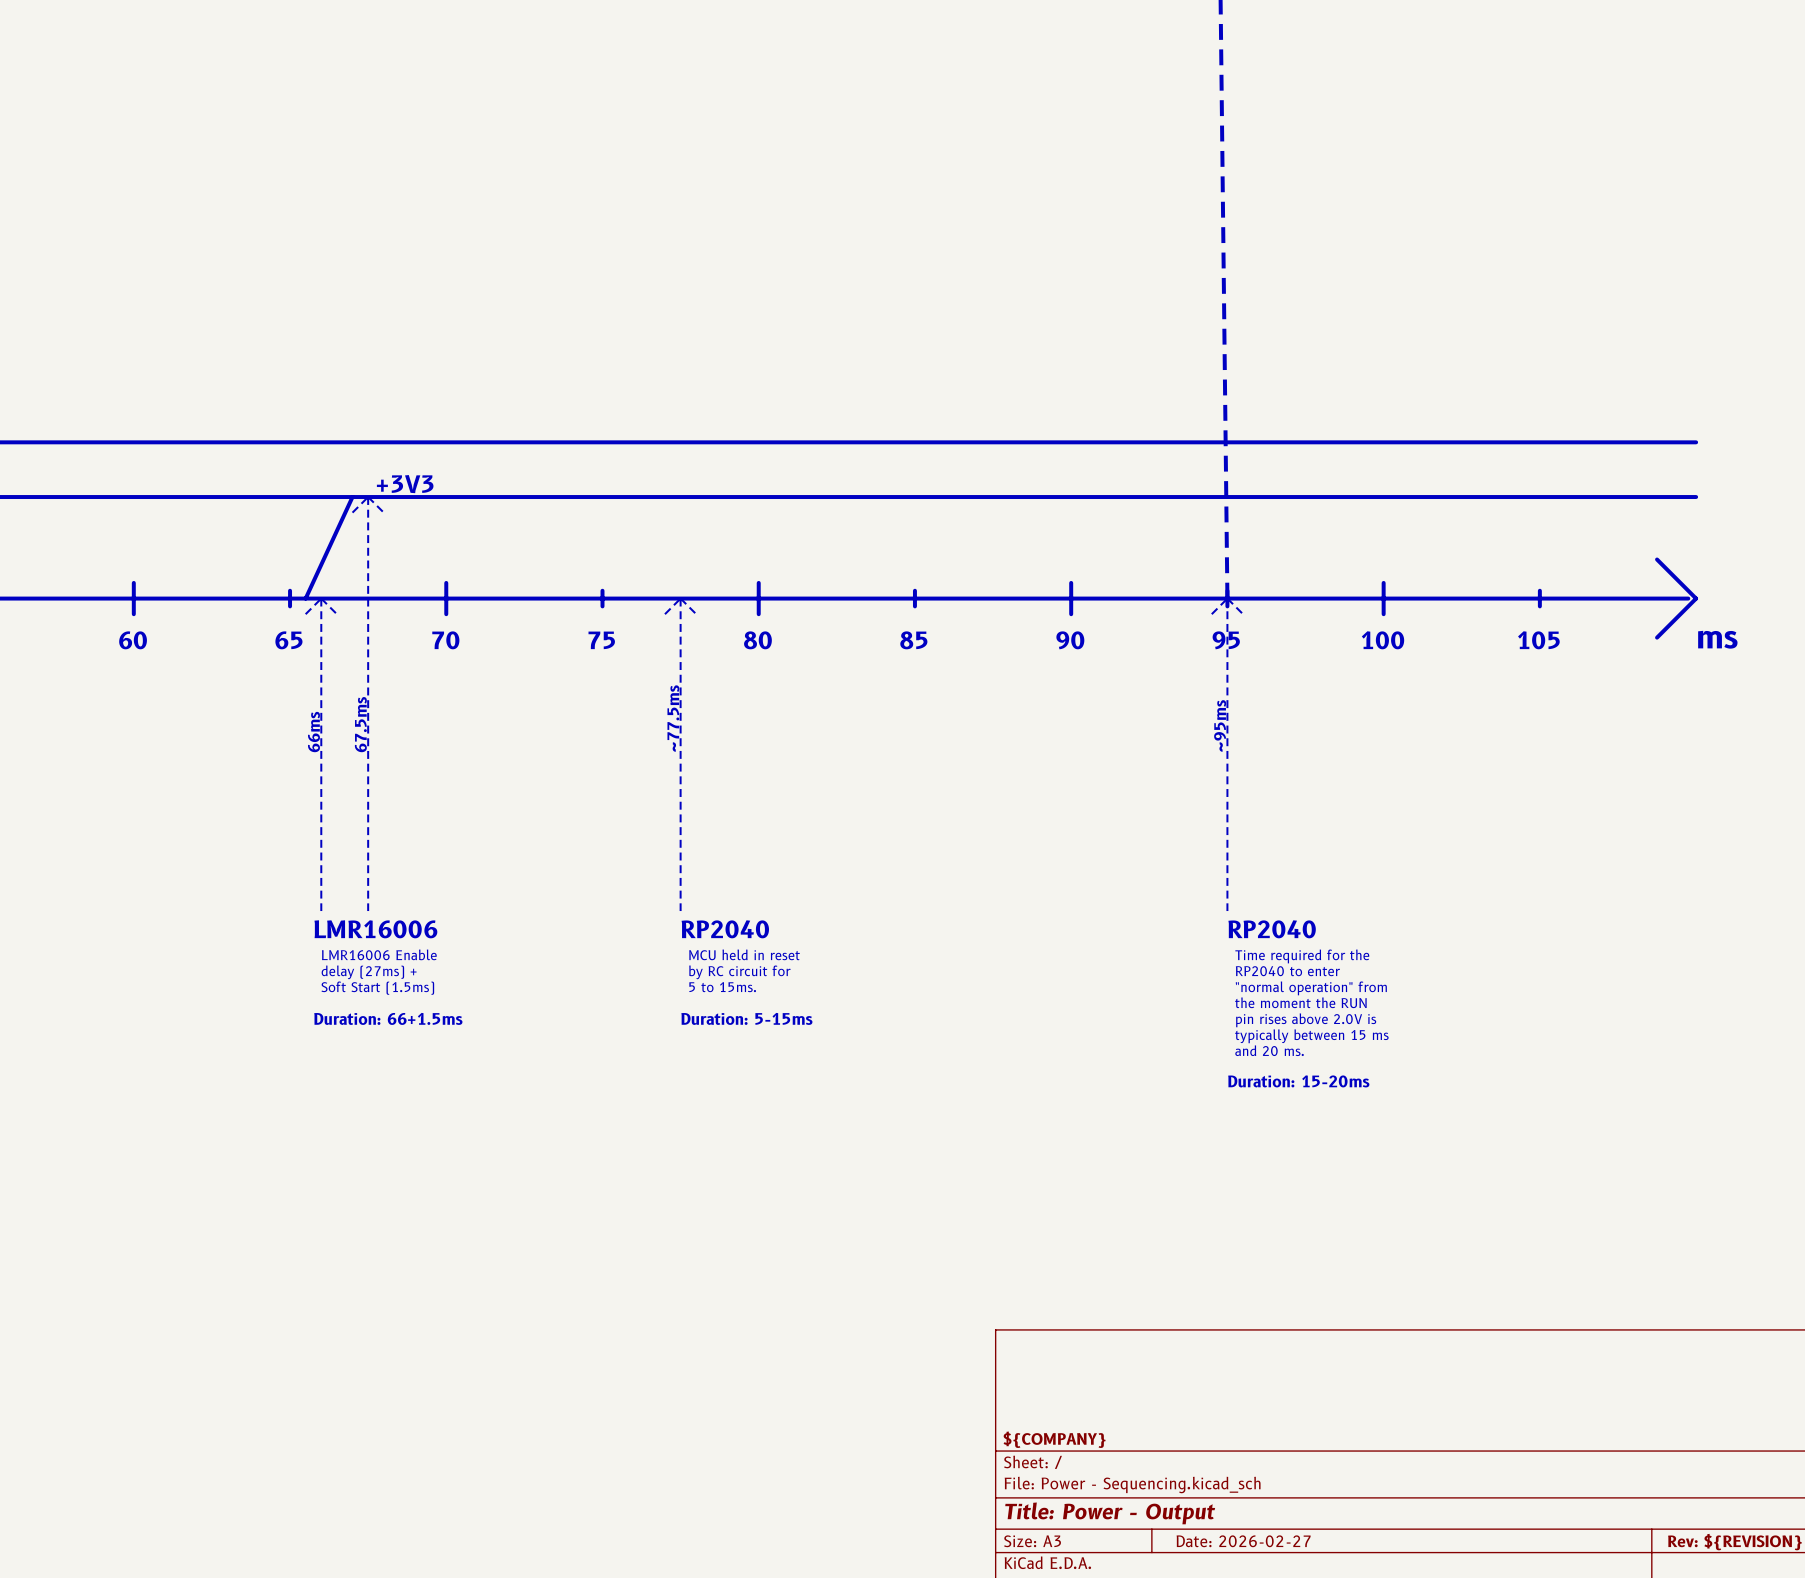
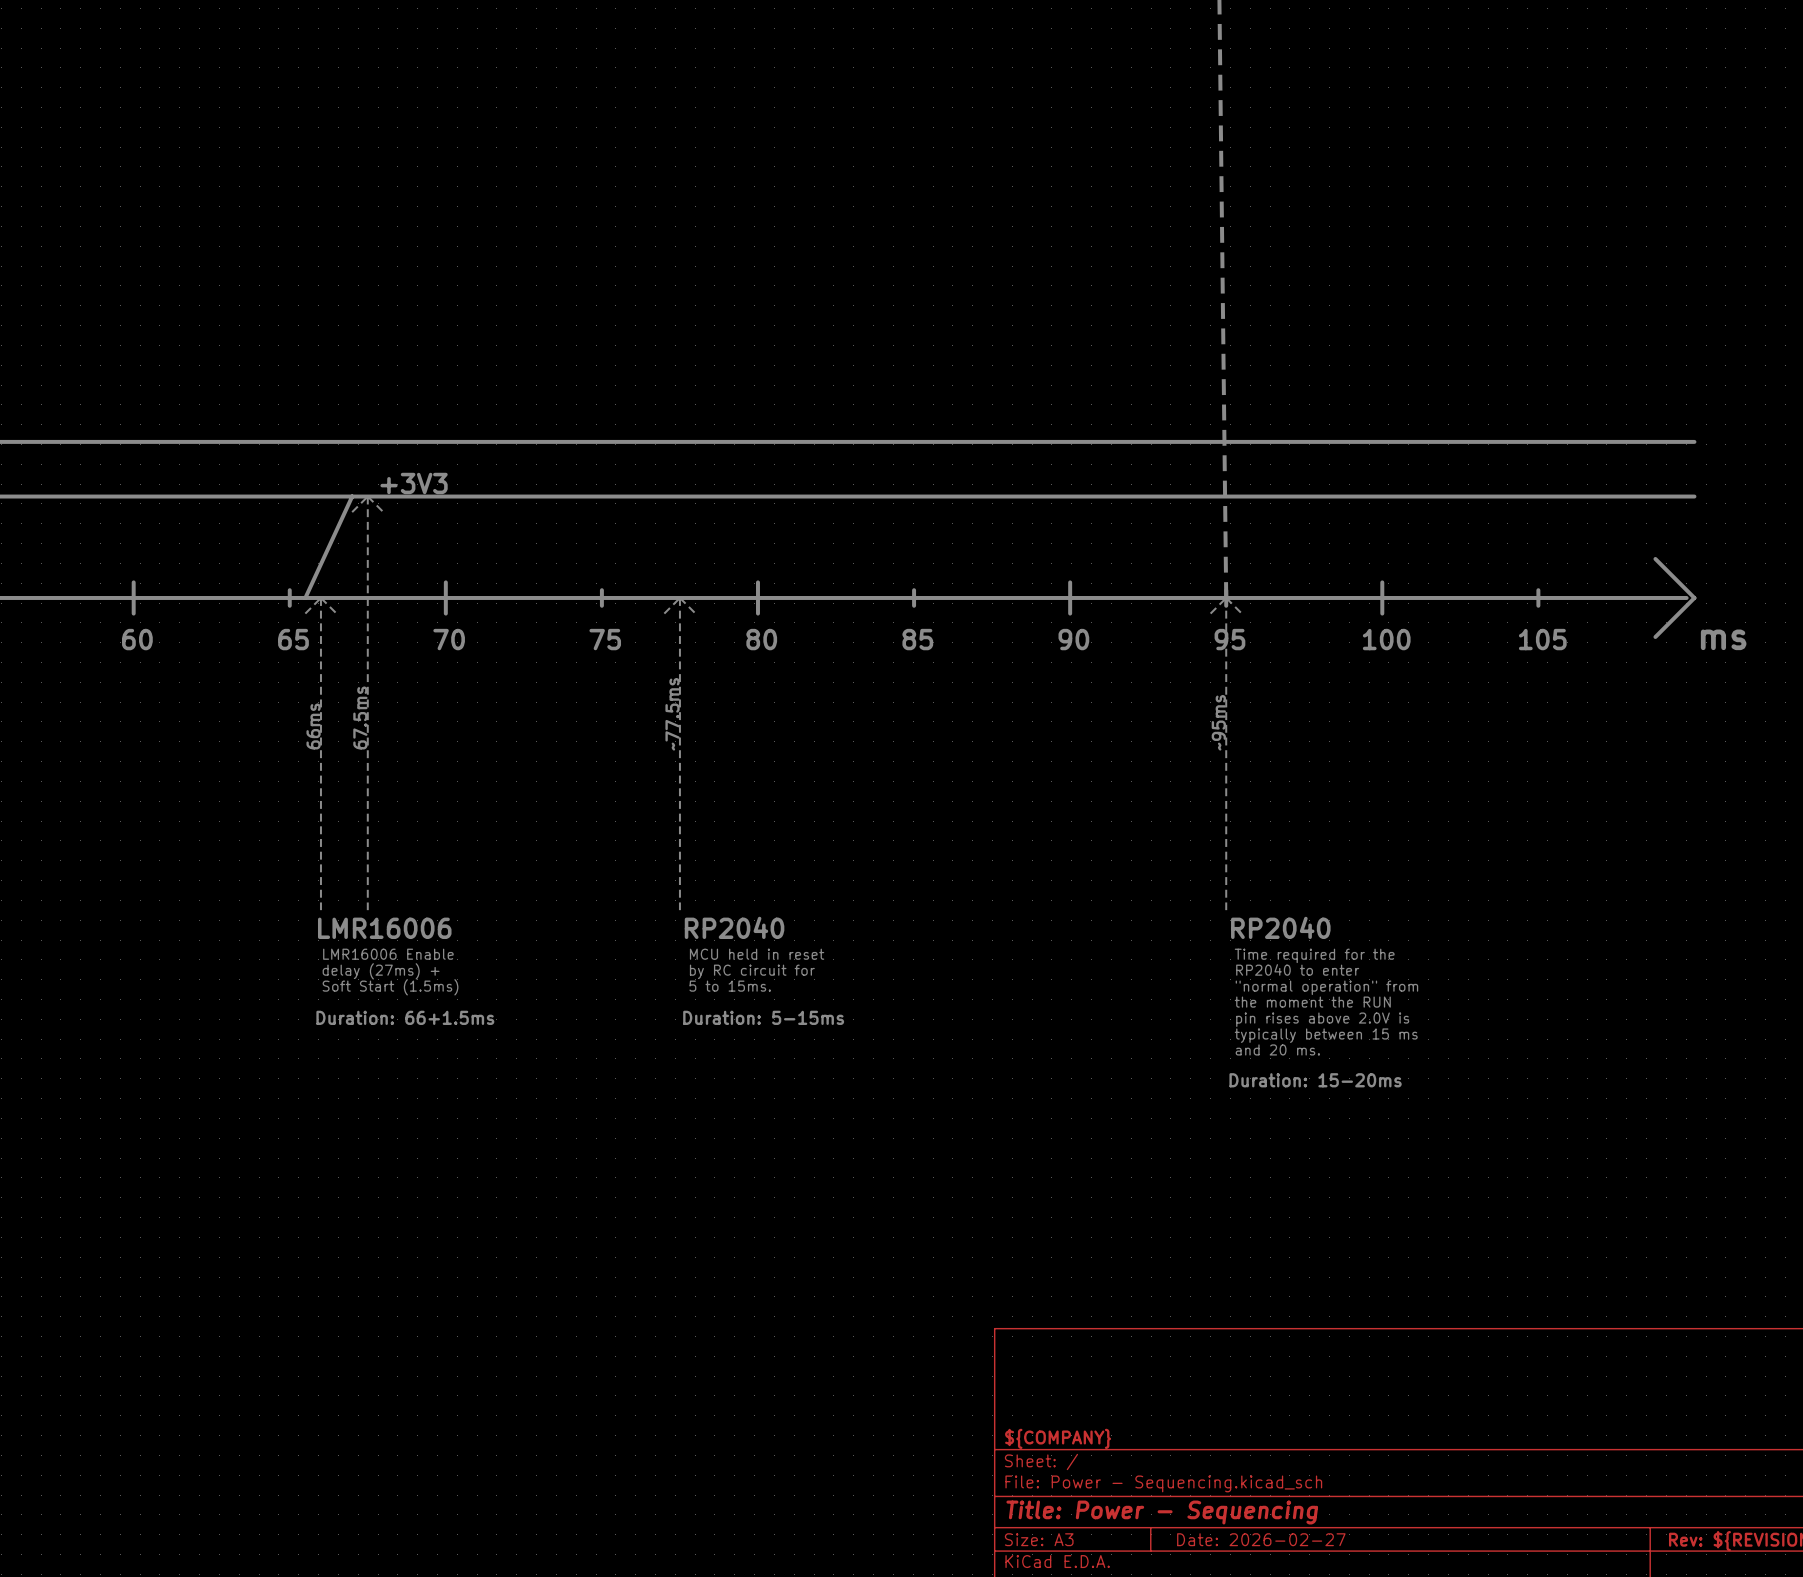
title block: Title: Power - Output (1110, 1513) -> Title: Power - Sequencing (1162, 1512)

